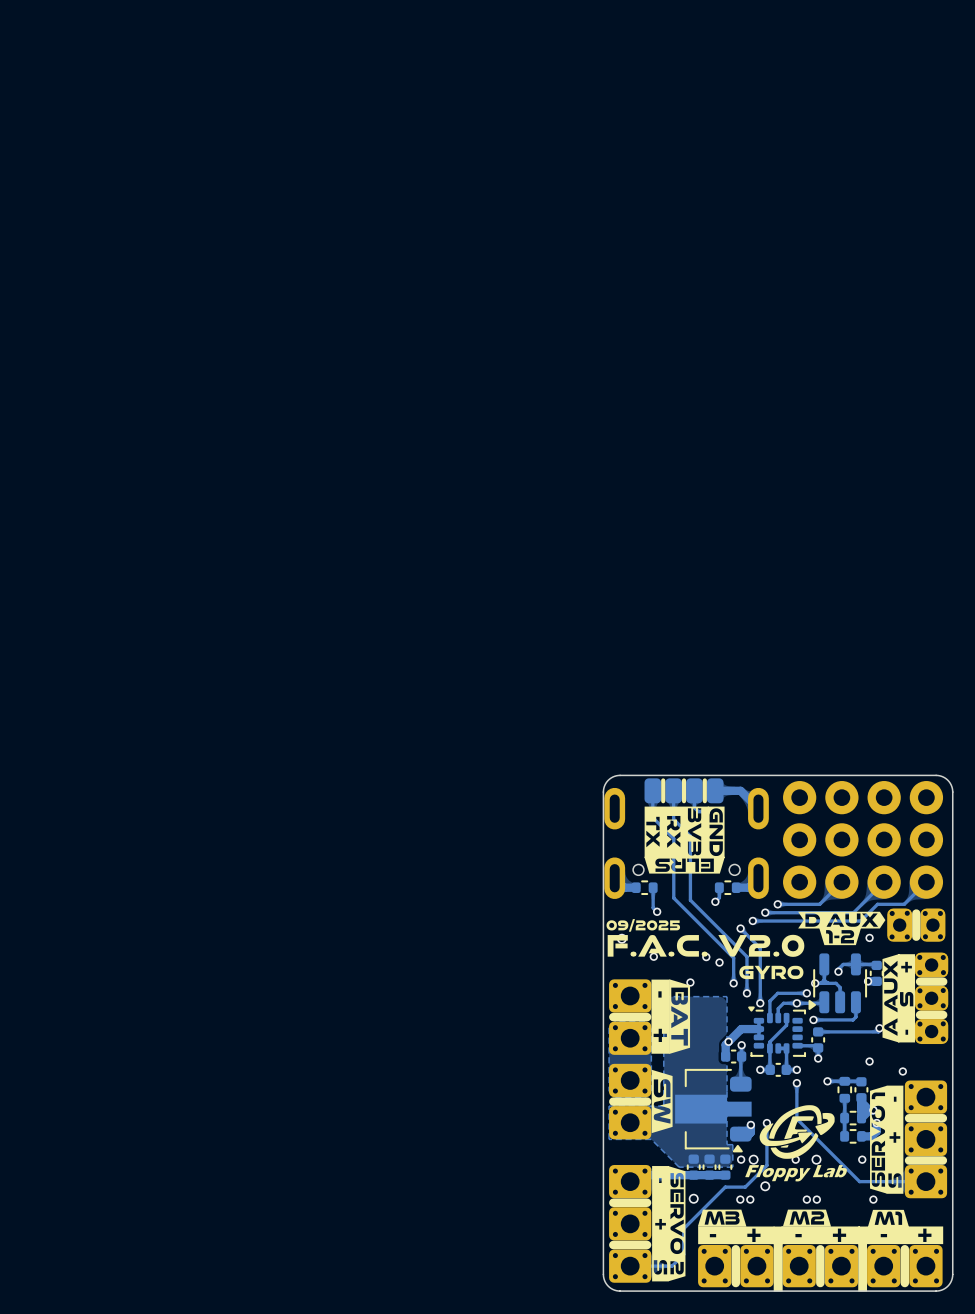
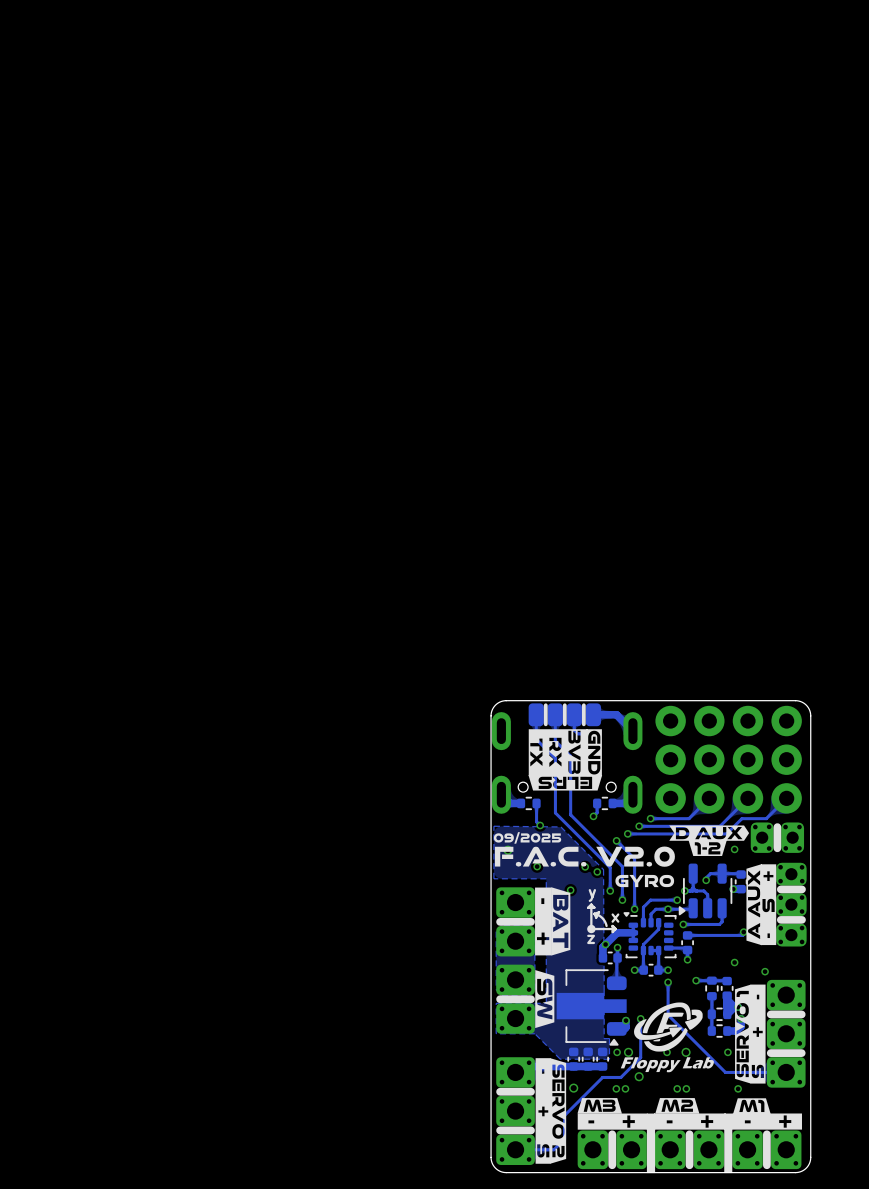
text: none -> y (592, 895)
zone outline: (663, 996) (727, 996) (727, 1091) -> (546, 903) (546, 878) (493, 878) (493, 826) (560, 826) (603, 869) (604, 989)
line: none -> (591, 904) (588, 907) (594, 907) (591, 904)
line: none -> (591, 904) (591, 929) (615, 929)
line: none -> (594, 913) (596, 917) (598, 912) (594, 913)
line: none -> (594, 913) (602, 918) (606, 925)
text: none -> x (615, 918)
drawing: none -> [587, 924, 596, 934]
line: none -> (615, 929) (612, 925) (612, 932) (615, 929)
text: none -> z (591, 939)

